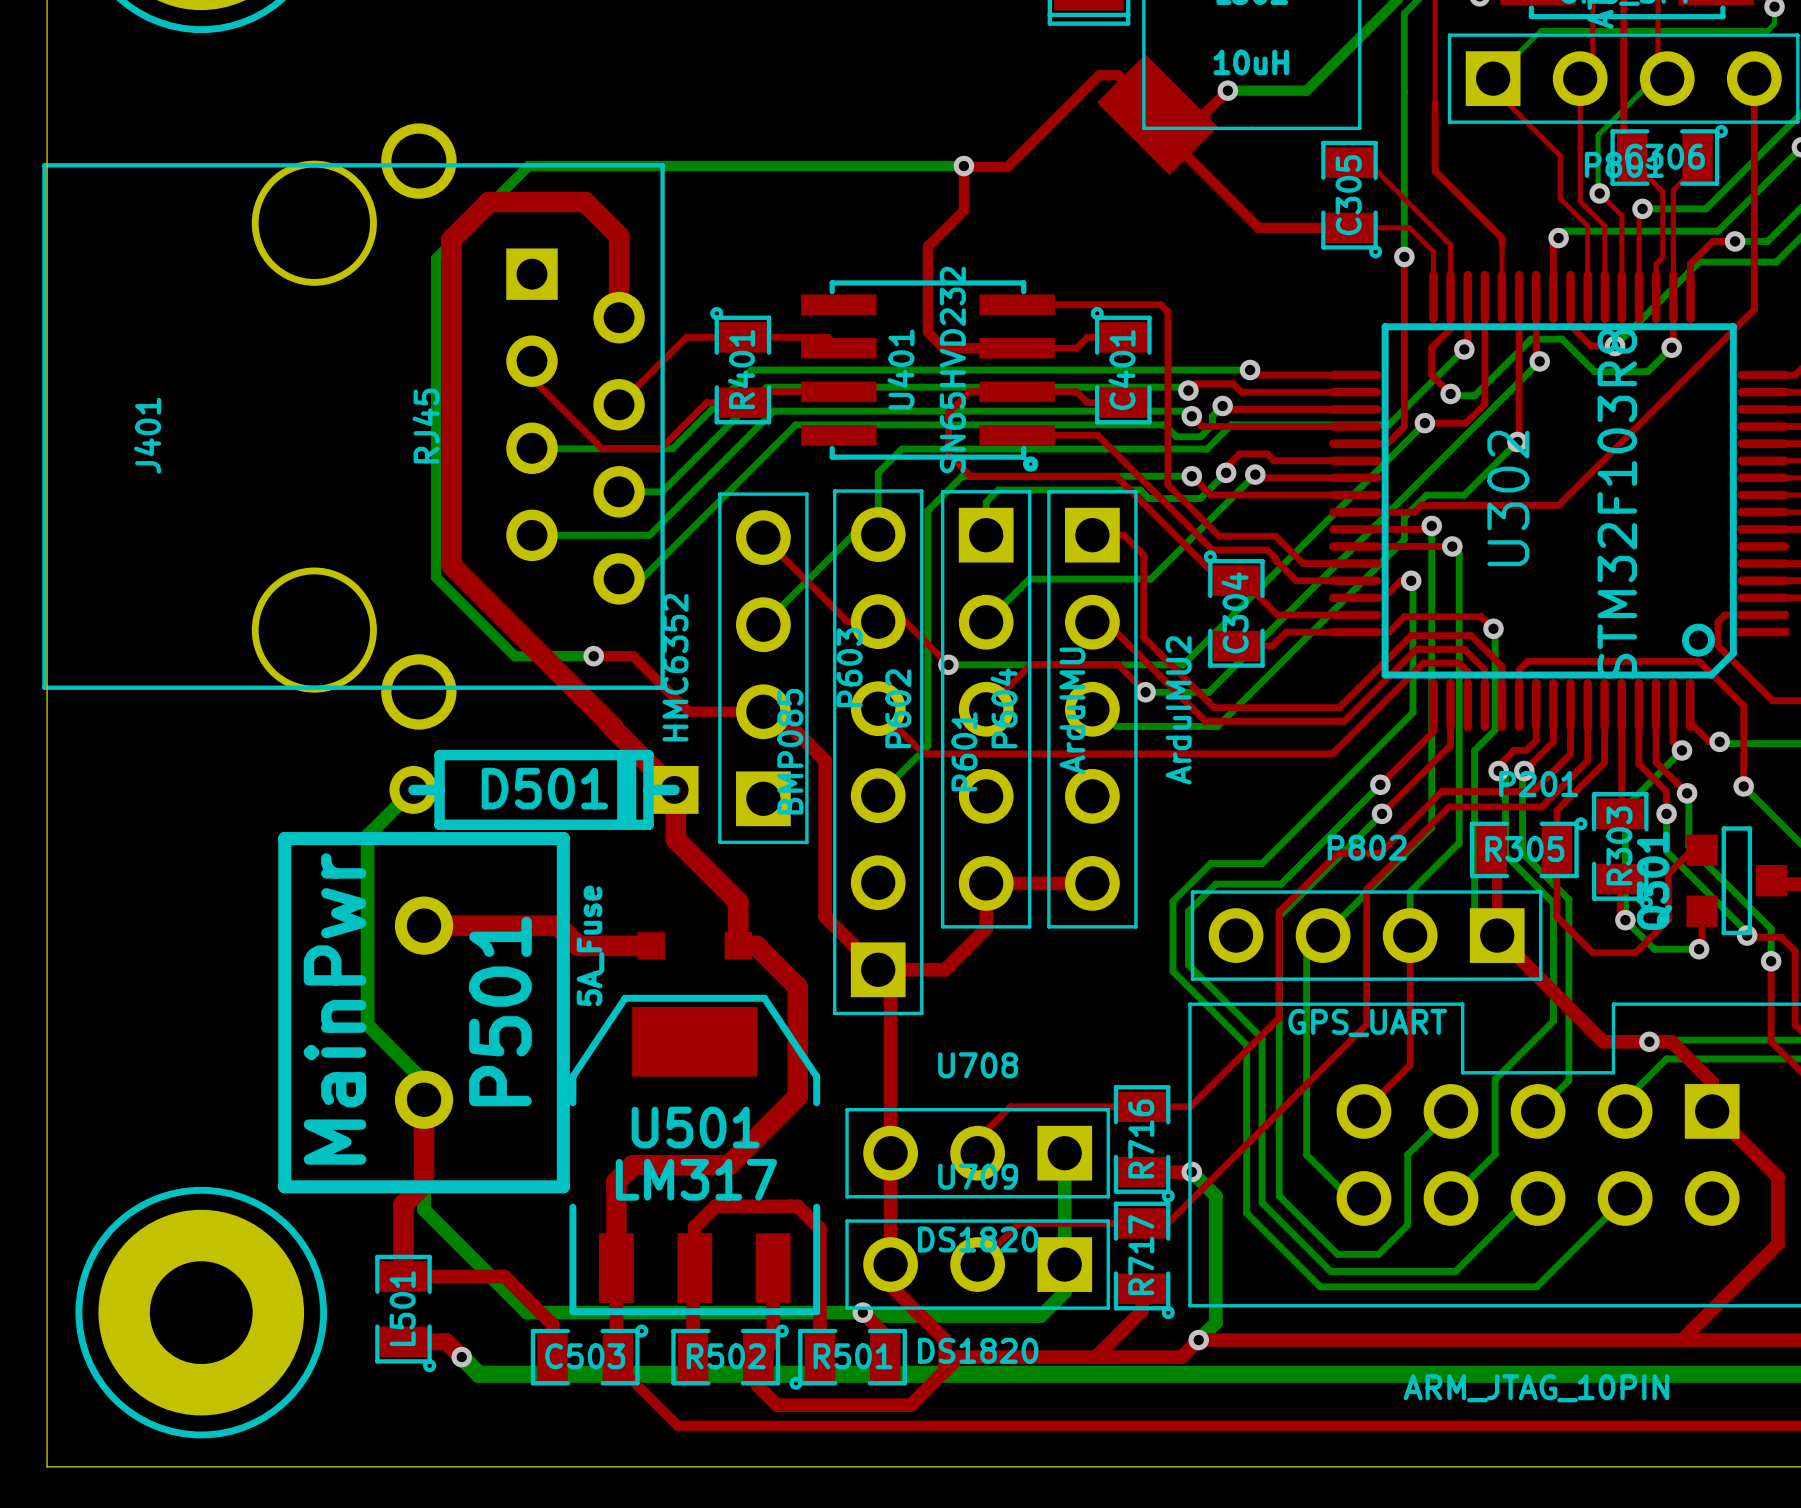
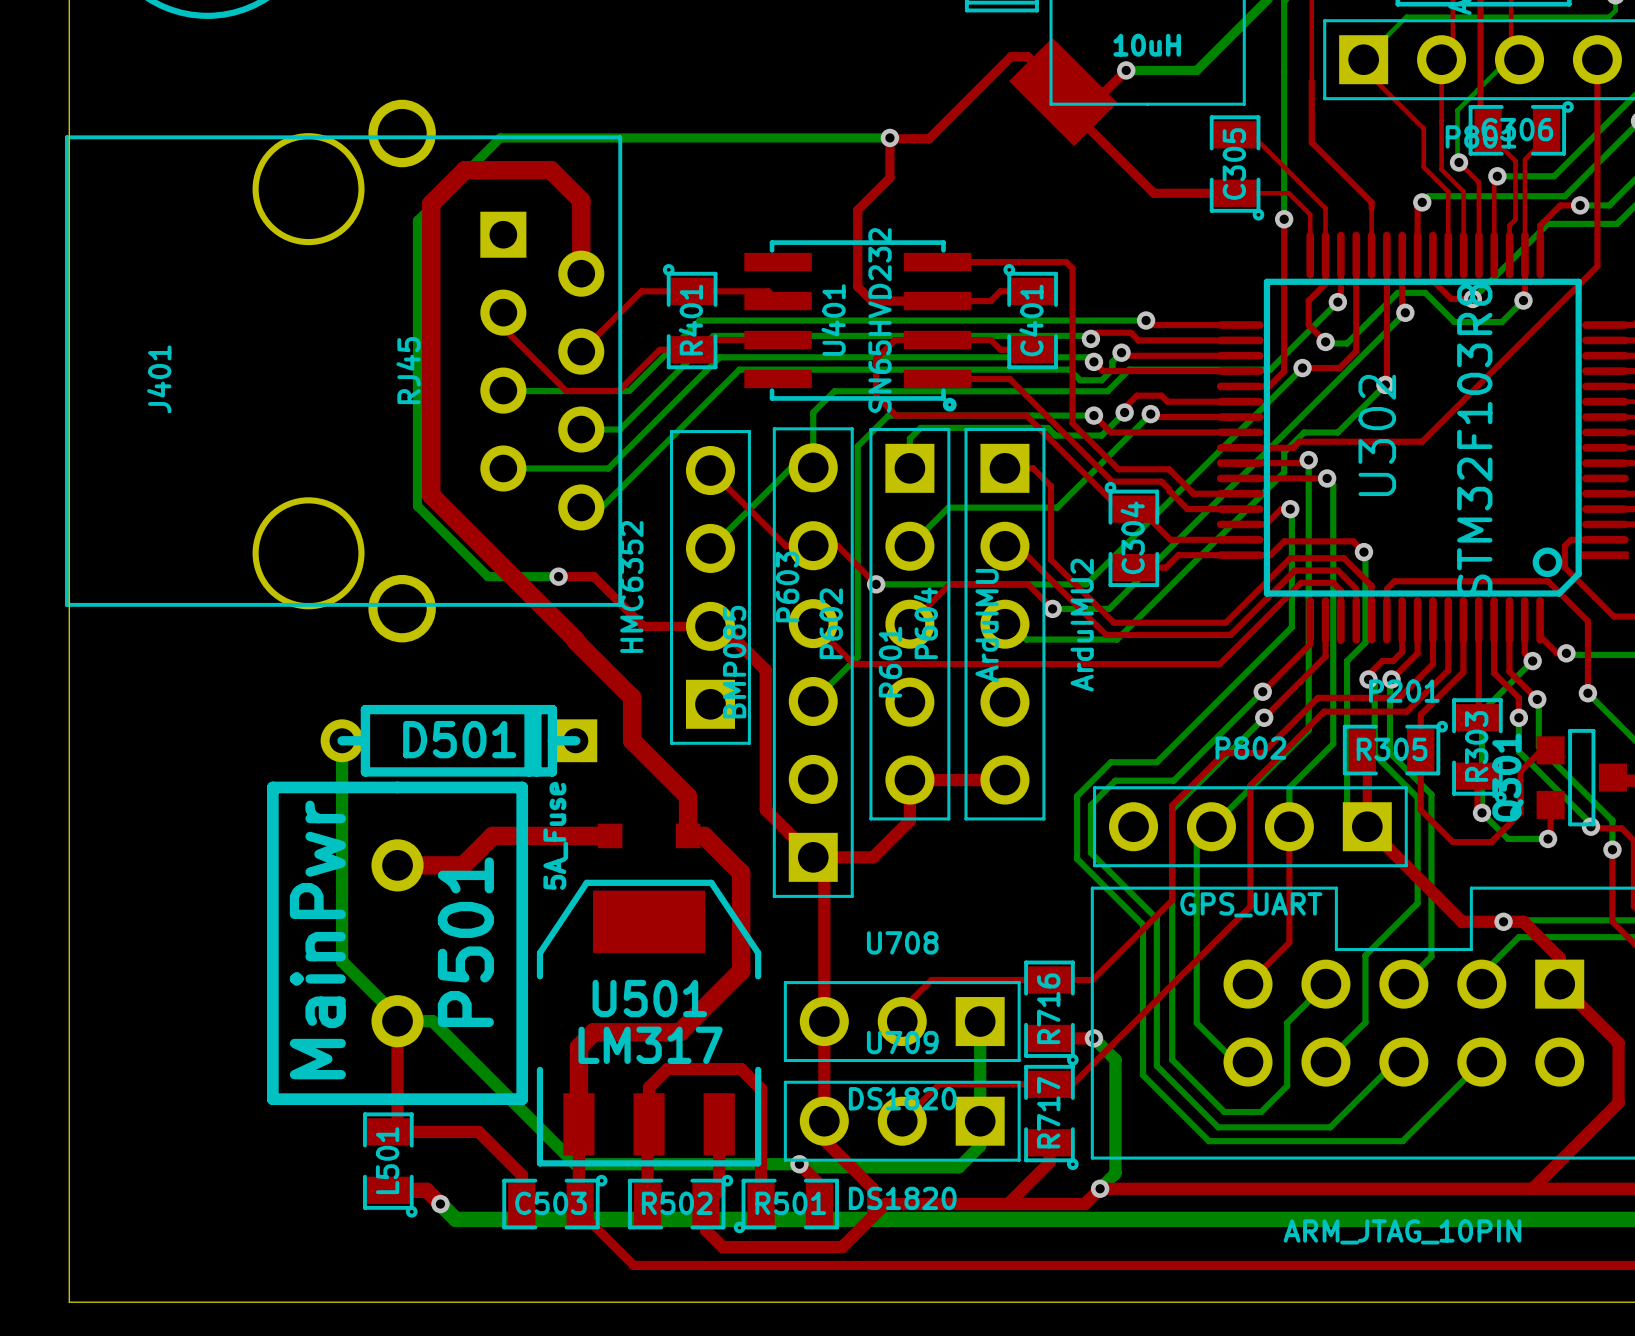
bottom track: (413, 789) (367, 835) (367, 1024) (424, 1081) (424, 1209) (526, 1312) (612, 1312) -> (342, 740) (342, 961) (397, 1016) (397, 1021) (432, 1021) (575, 1164)
D501 position: (544, 789) -> (458, 740)
top track: (424, 925) (558, 925) (578, 945) -> (397, 865) (463, 865) (492, 835) (544, 835)
P501 position: (424, 1012) -> (397, 943)
top track: (424, 1099) (424, 1184) (403, 1204) (403, 1276) -> (397, 1021) (397, 1122) (388, 1131)
part: (201, 1312) -> none

